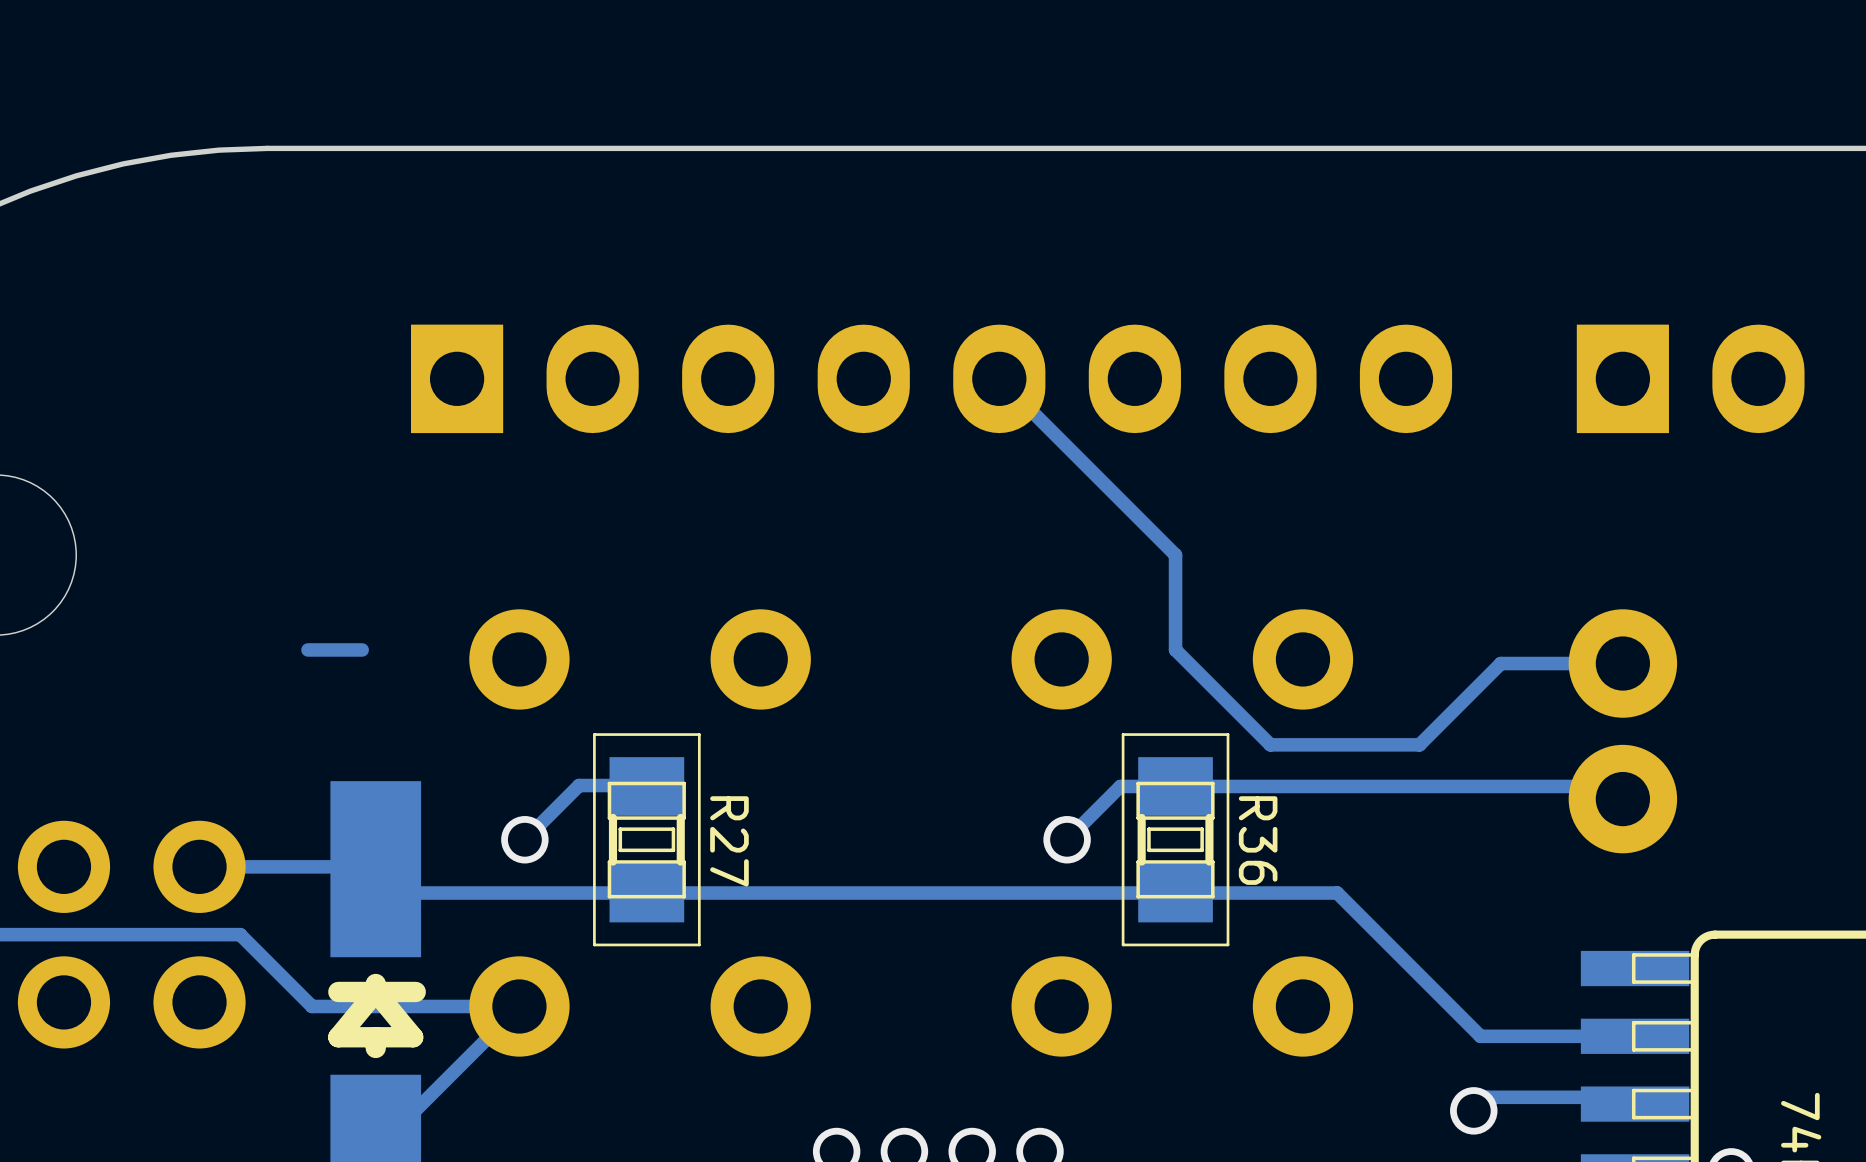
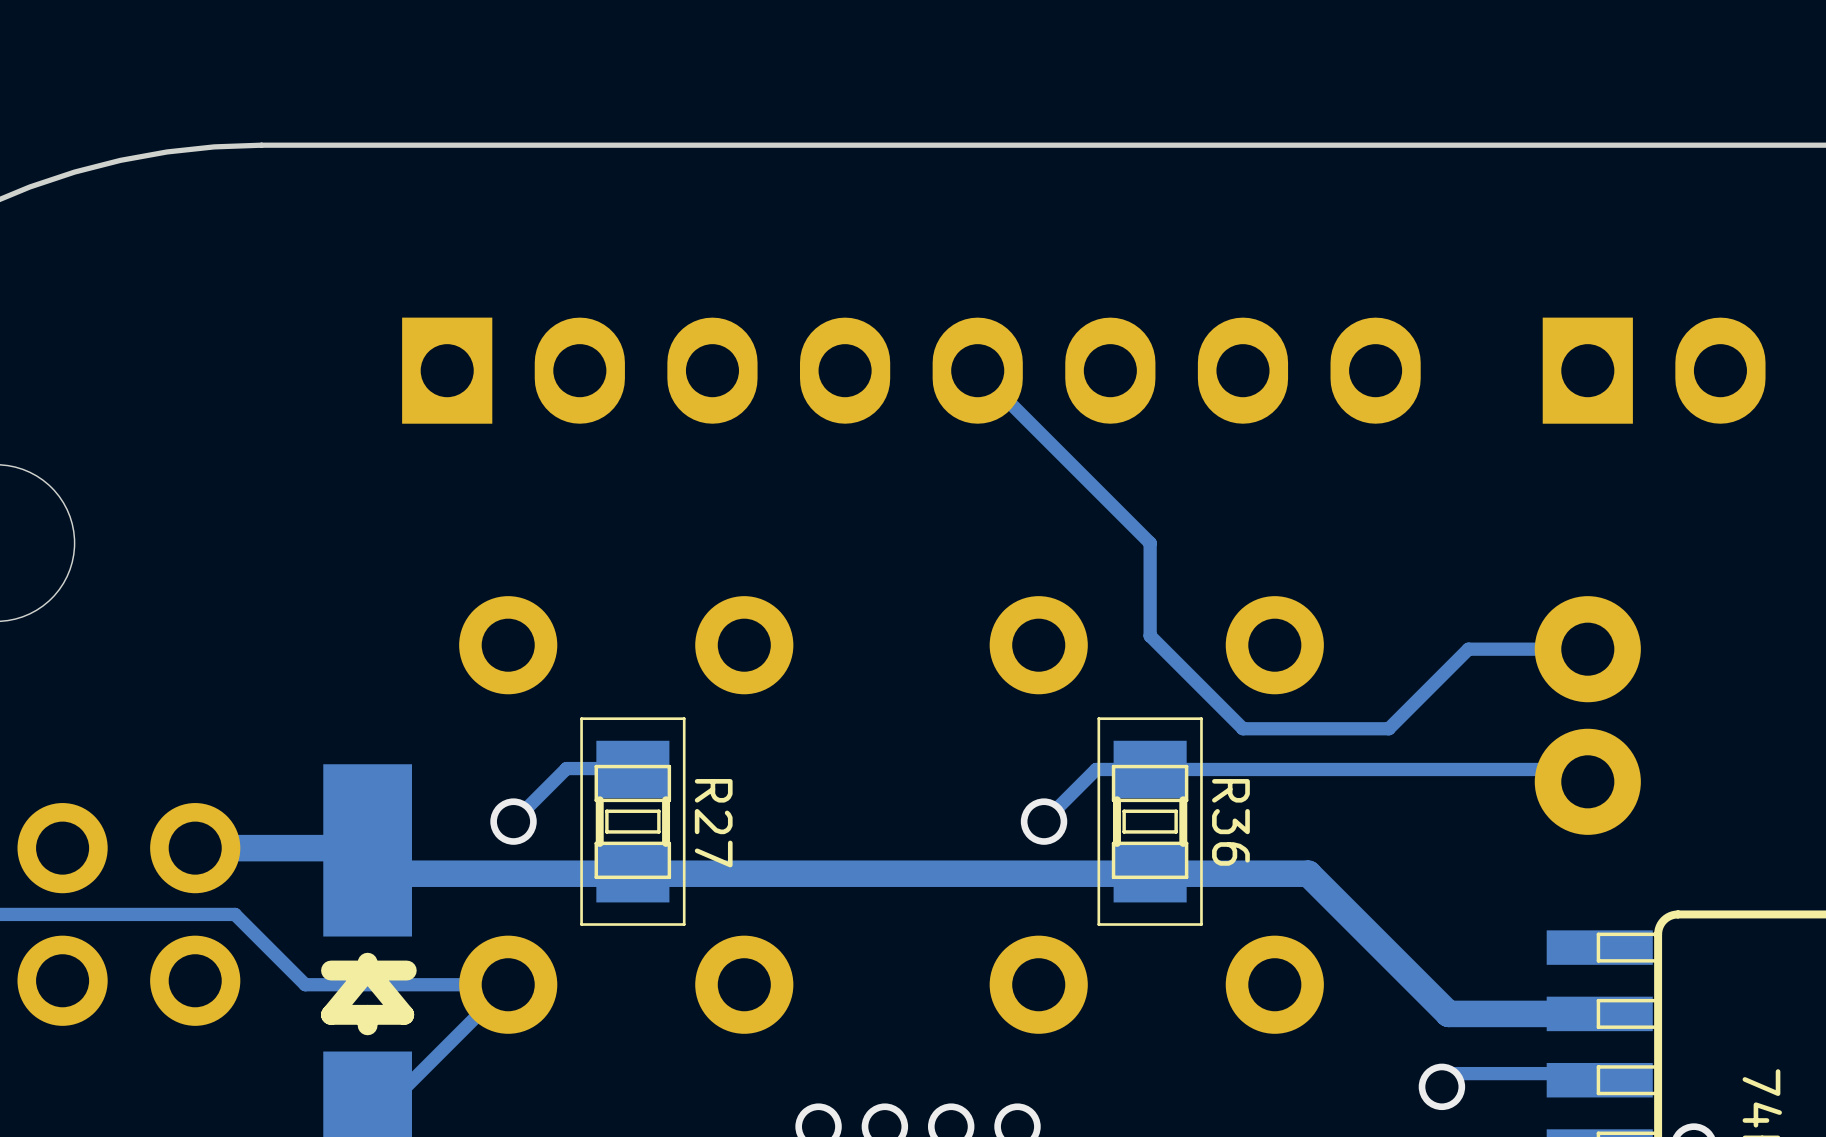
track: (362, 649) (307, 649) -> none
track width: thin (373, 866) (199, 866) -> thick (365, 848) (195, 848)
track width: thin (618, 893) (399, 893) -> thick (605, 873) (390, 873)
track width: thin (1147, 893) (646, 893) -> thick (1122, 873) (632, 873)
track width: thin (1175, 893) (1337, 893) (1480, 1036) (1635, 1036) -> thick (1150, 873) (1308, 873) (1448, 1013) (1599, 1013)

